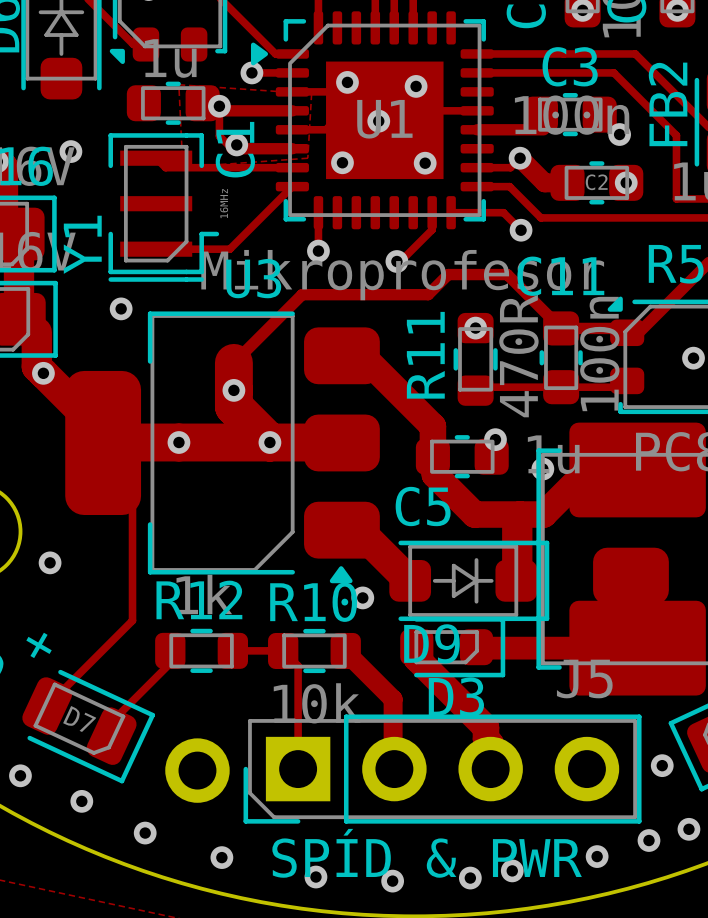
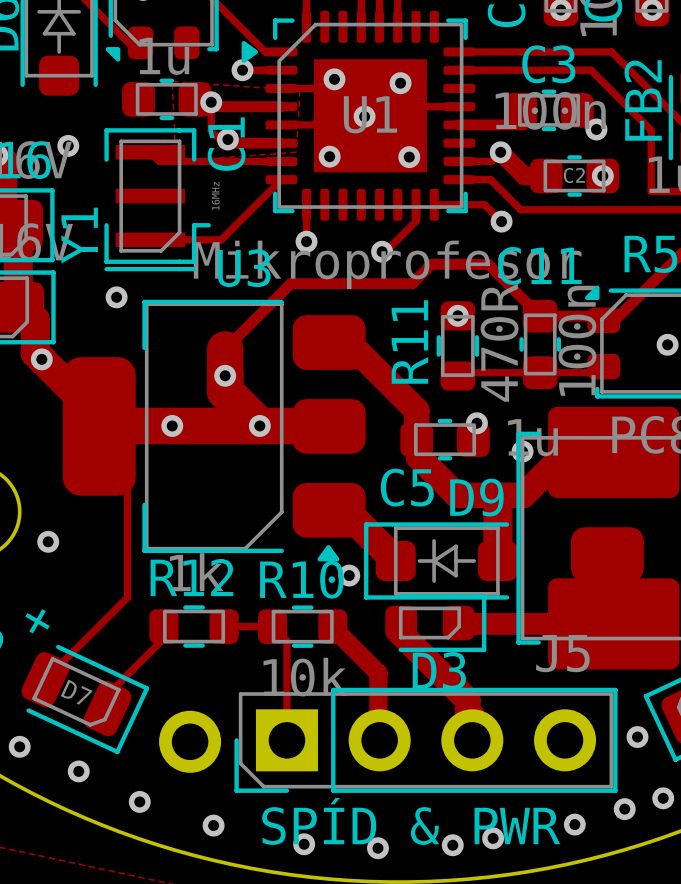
D9 rotation: 0° (469, 580) -> 180° (441, 560)

